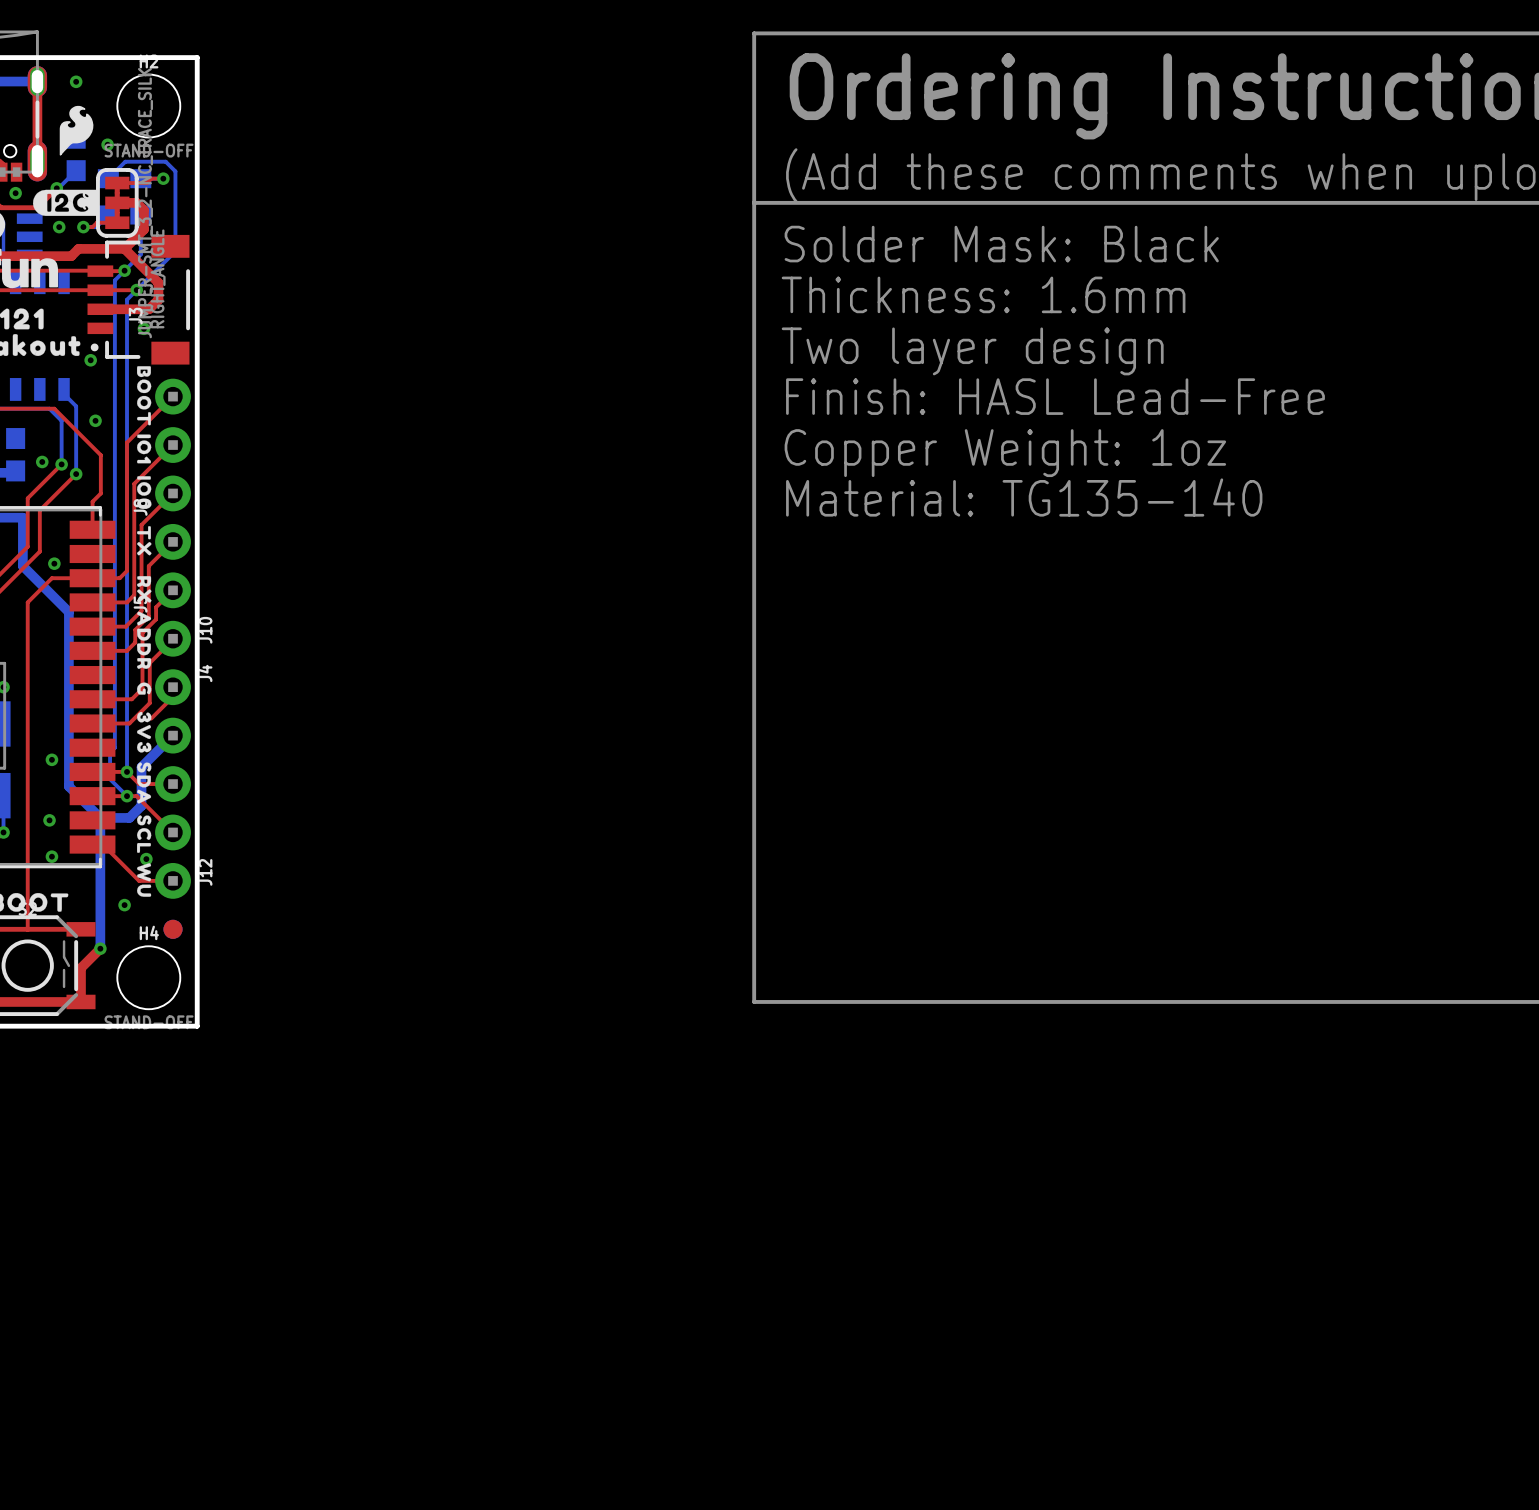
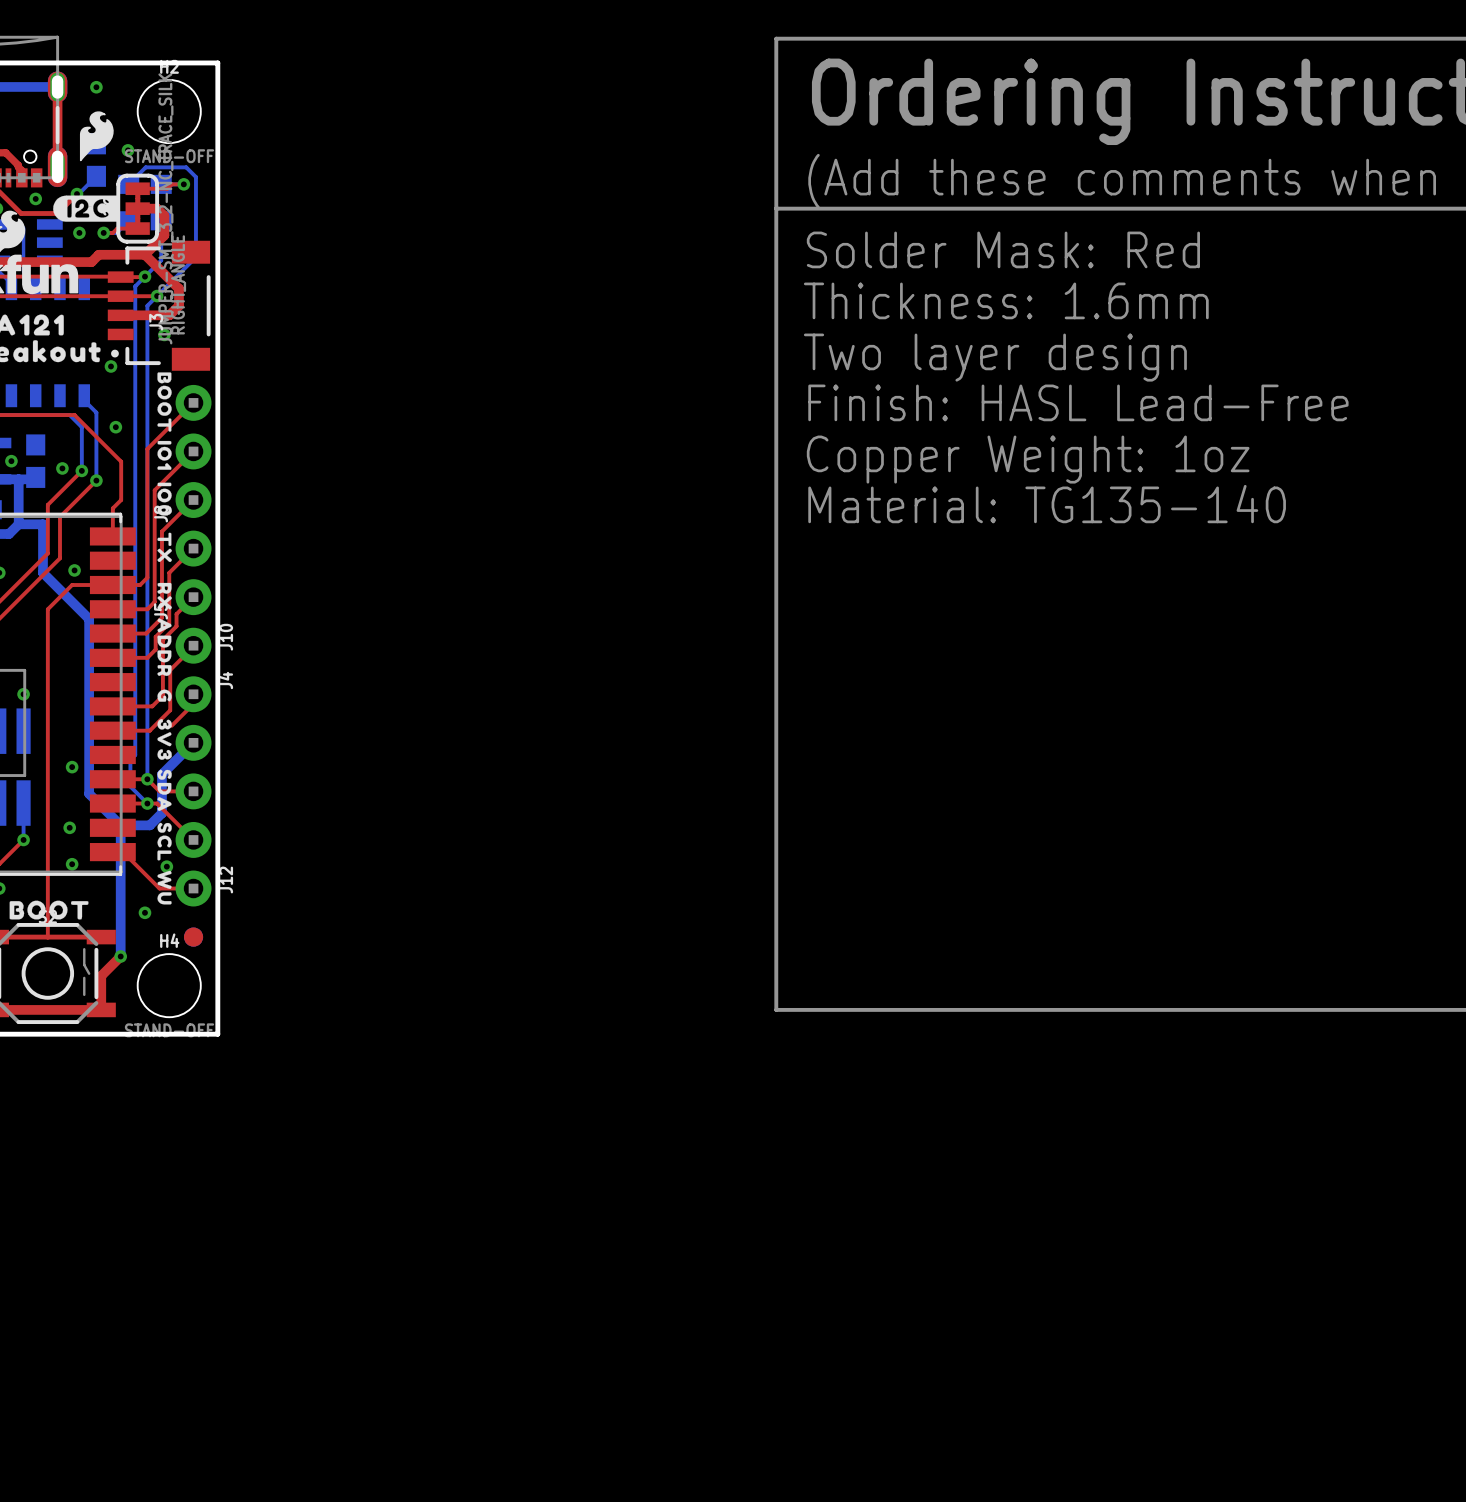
text: Solder Mask: Black (1001, 244) -> Solder Mask: Red (1003, 249)

